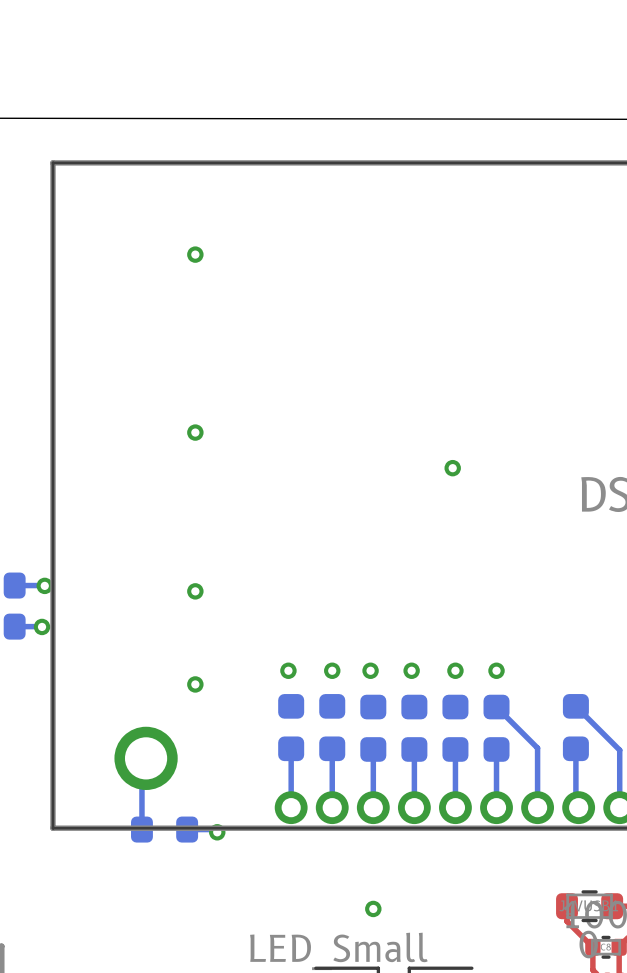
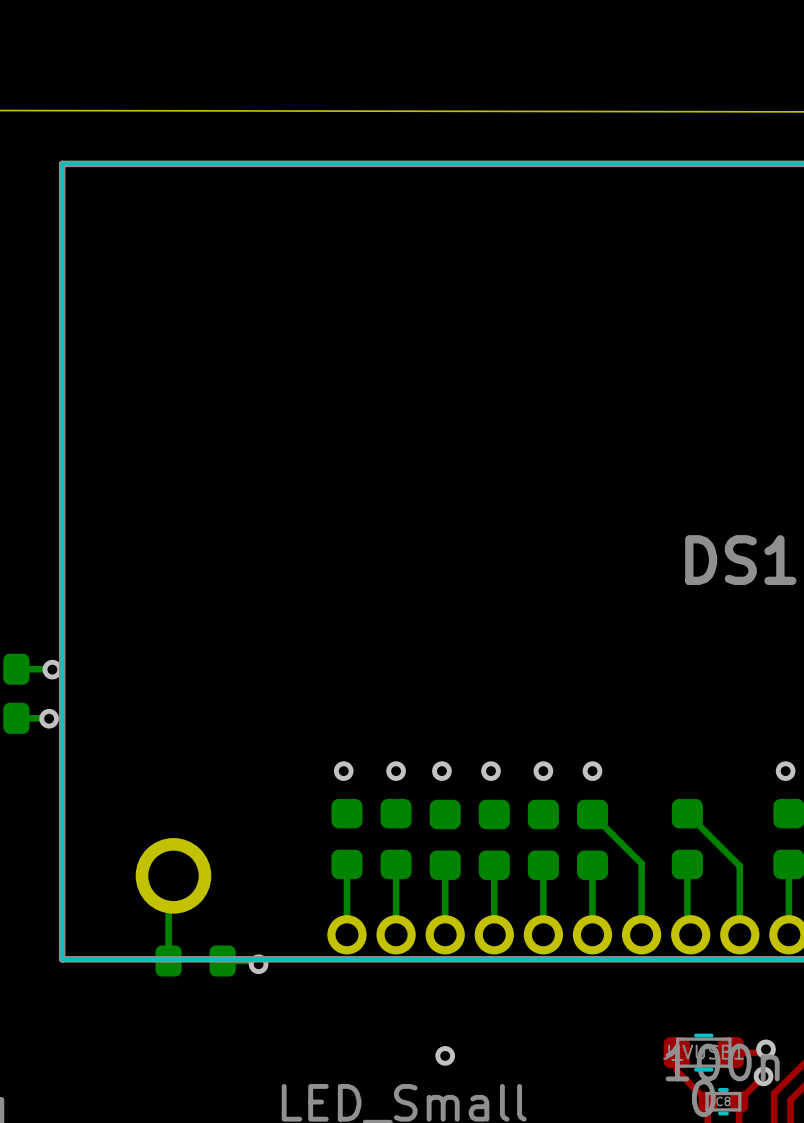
via: (195, 254) -> none
via: (195, 432) -> none
via: (452, 468) -> none
via: (195, 591) -> none
via: (195, 684) -> none

